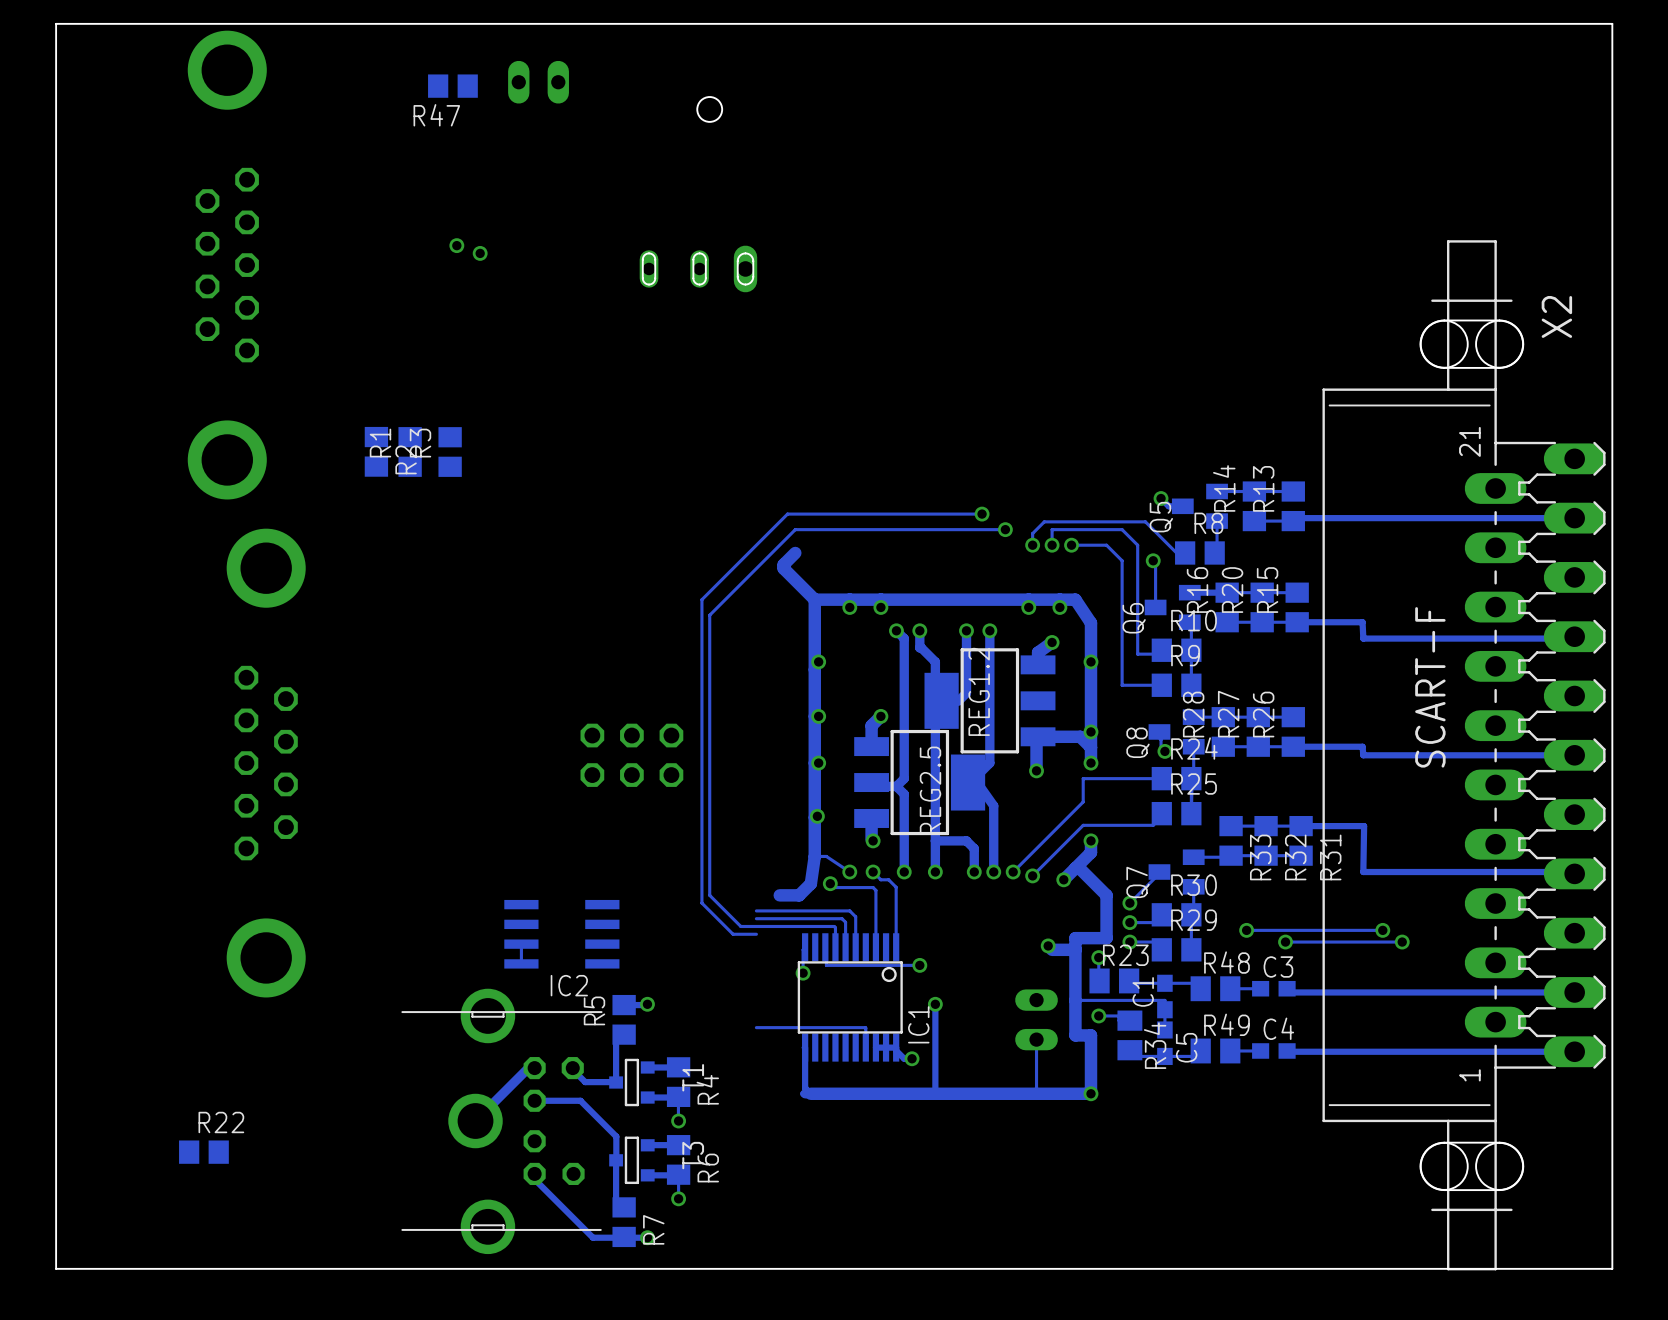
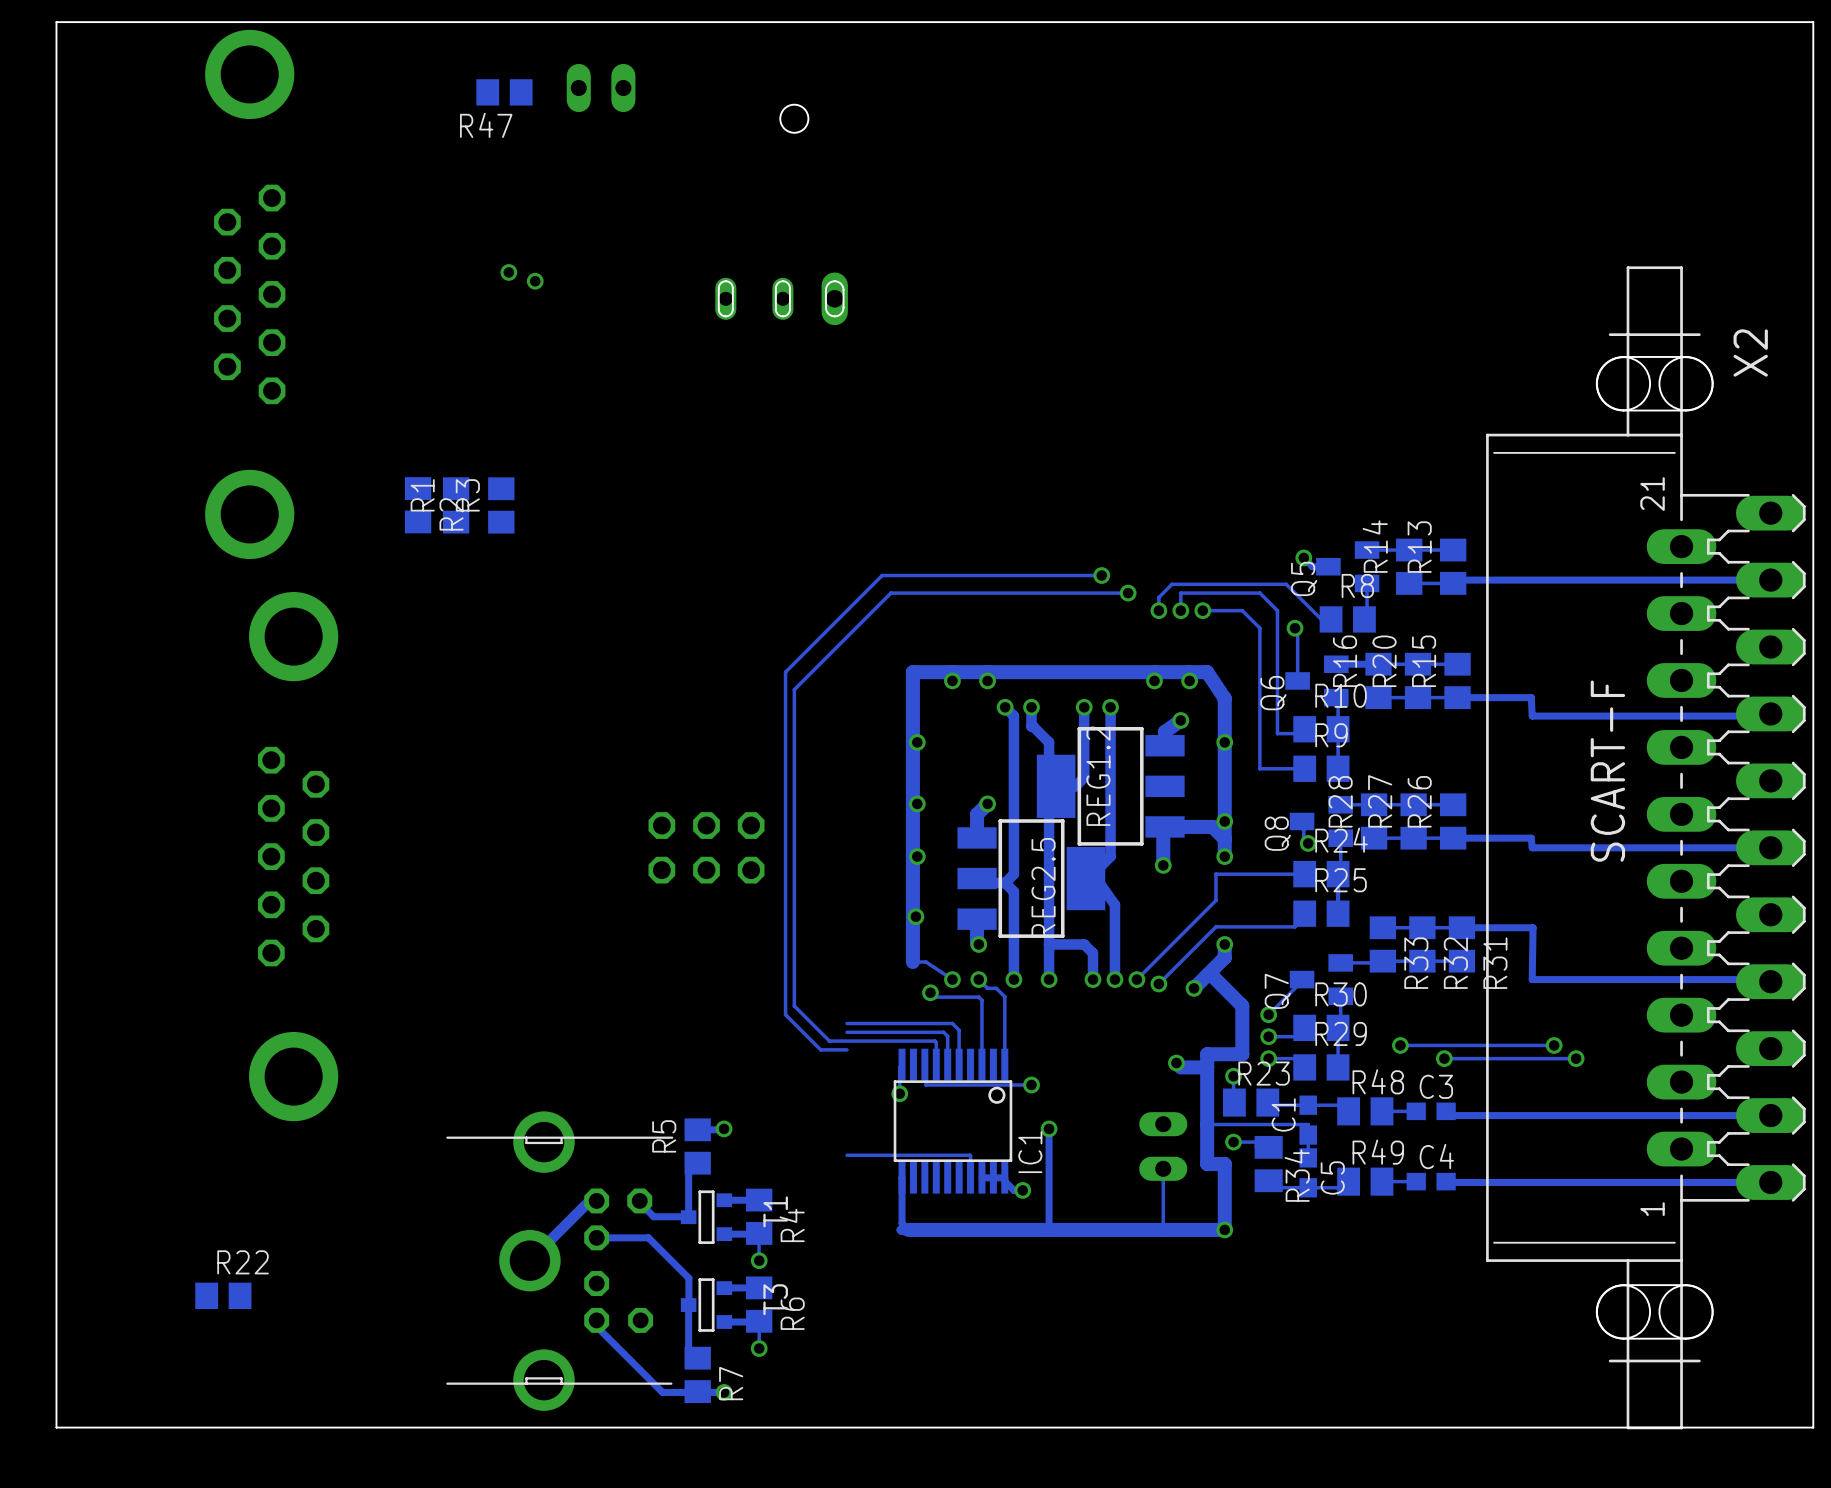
track: (795, 552) (783, 564) (783, 568) (814, 599) -> none
track: (814, 856) (810, 883) (799, 895) (779, 895) -> none
IC2: (561, 934) -> none
track: (521, 944) (521, 963) -> none

